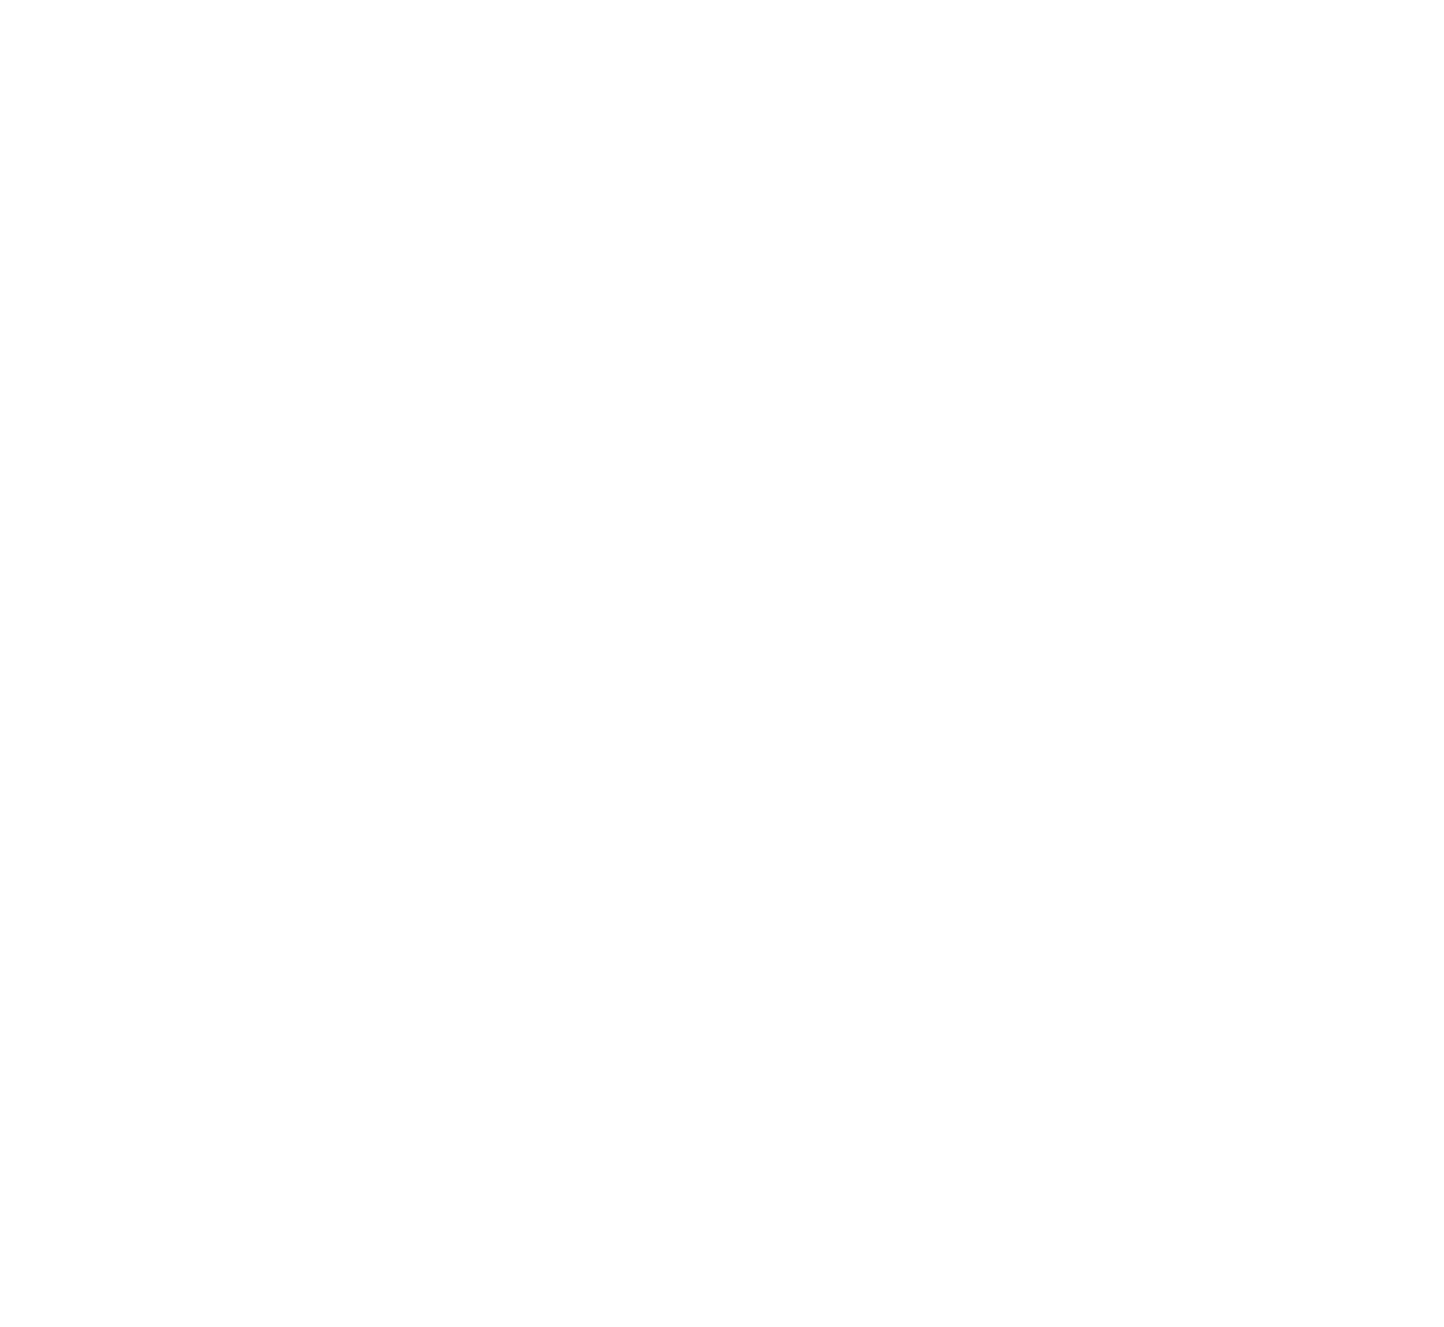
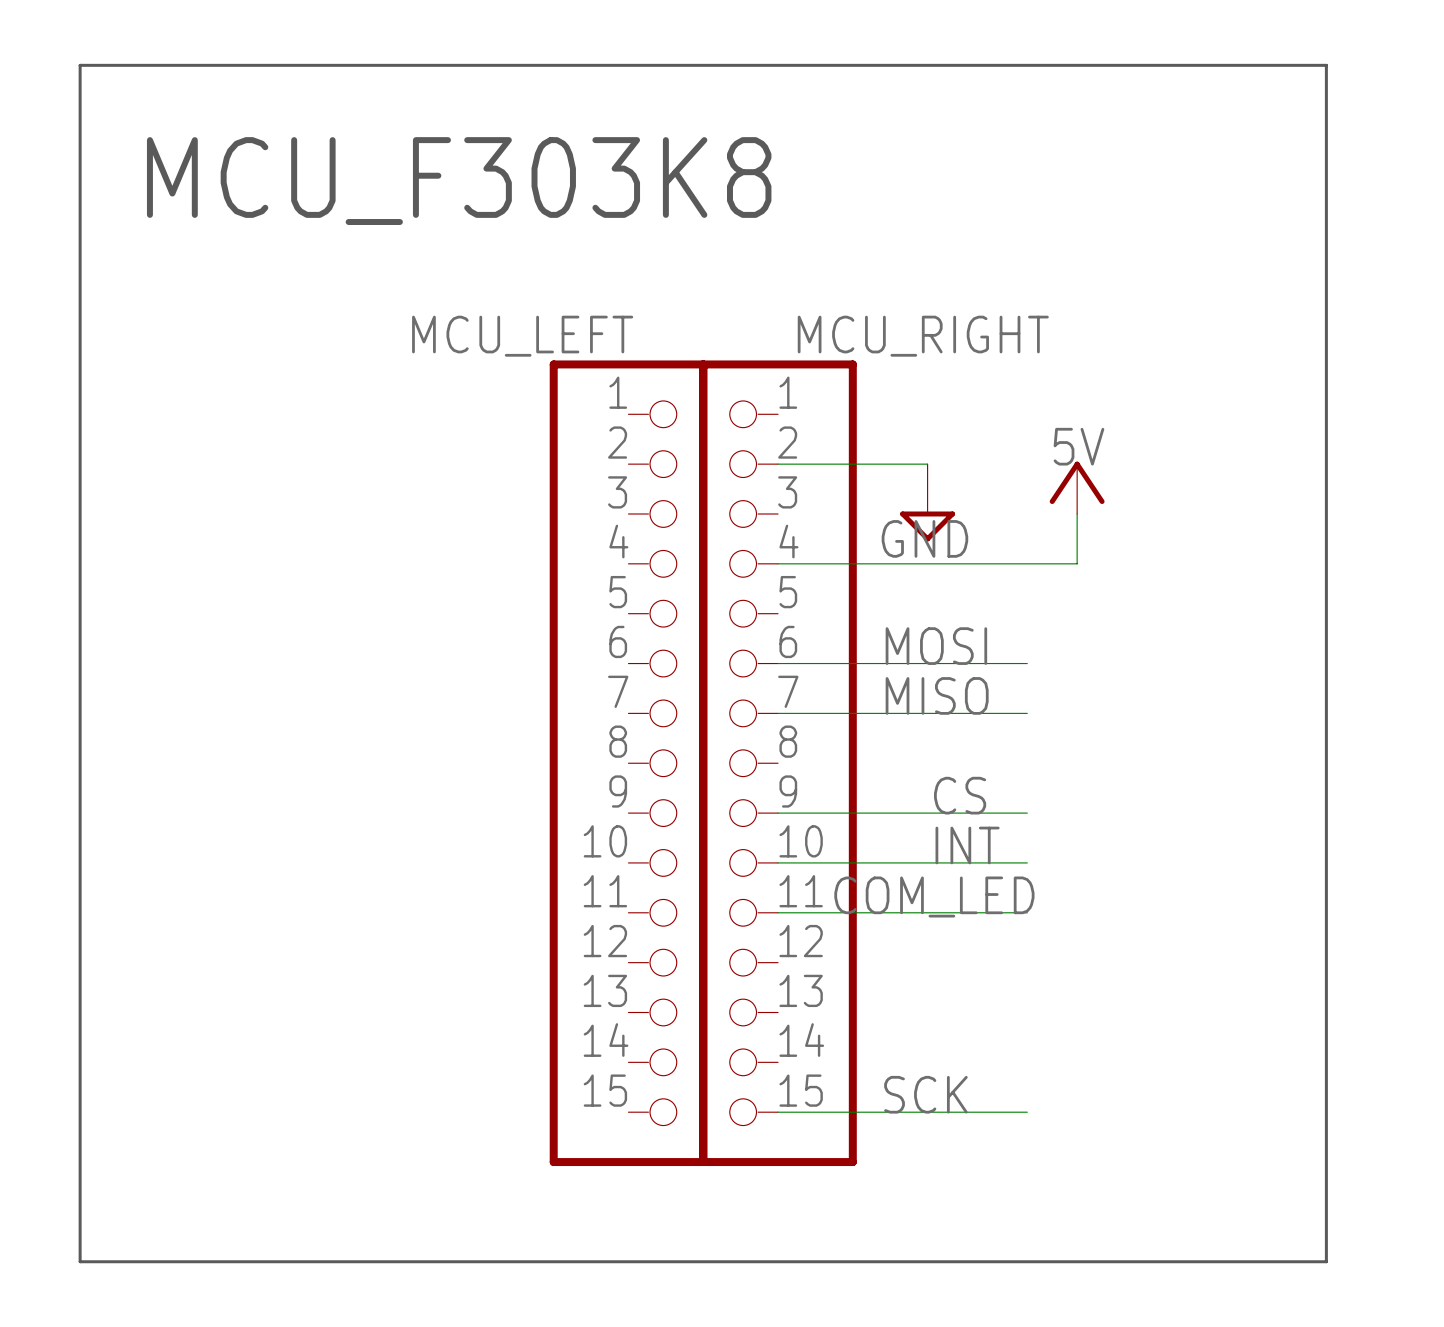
line: none -> (80, 65) (80, 1261) (1326, 1261) (1326, 65) (80, 65)
text: none -> MCU_F303K8 (459, 181)
label: none -> 5V (1078, 446)
wire: none -> (778, 464) (927, 464)
power symbol: none -> (1077, 487)
power symbol: none -> GND (927, 502)
wire: none -> (1077, 513) (1077, 563) (778, 563)
label: none -> MOSI (936, 646)
wire: none -> (778, 663) (1027, 663)
label: none -> MISO (937, 695)
wire: none -> (778, 713) (1027, 713)
MCU_LEFT: none -> (628, 763)
MCU_RIGHT: none -> (778, 763)
label: none -> CS (960, 795)
wire: none -> (778, 813) (1027, 813)
label: none -> INT (967, 845)
wire: none -> (778, 862) (1027, 862)
label: none -> COM_LED (934, 897)
wire: none -> (778, 912) (1027, 912)
label: none -> SCK (925, 1094)
wire: none -> (778, 1112) (1027, 1112)

